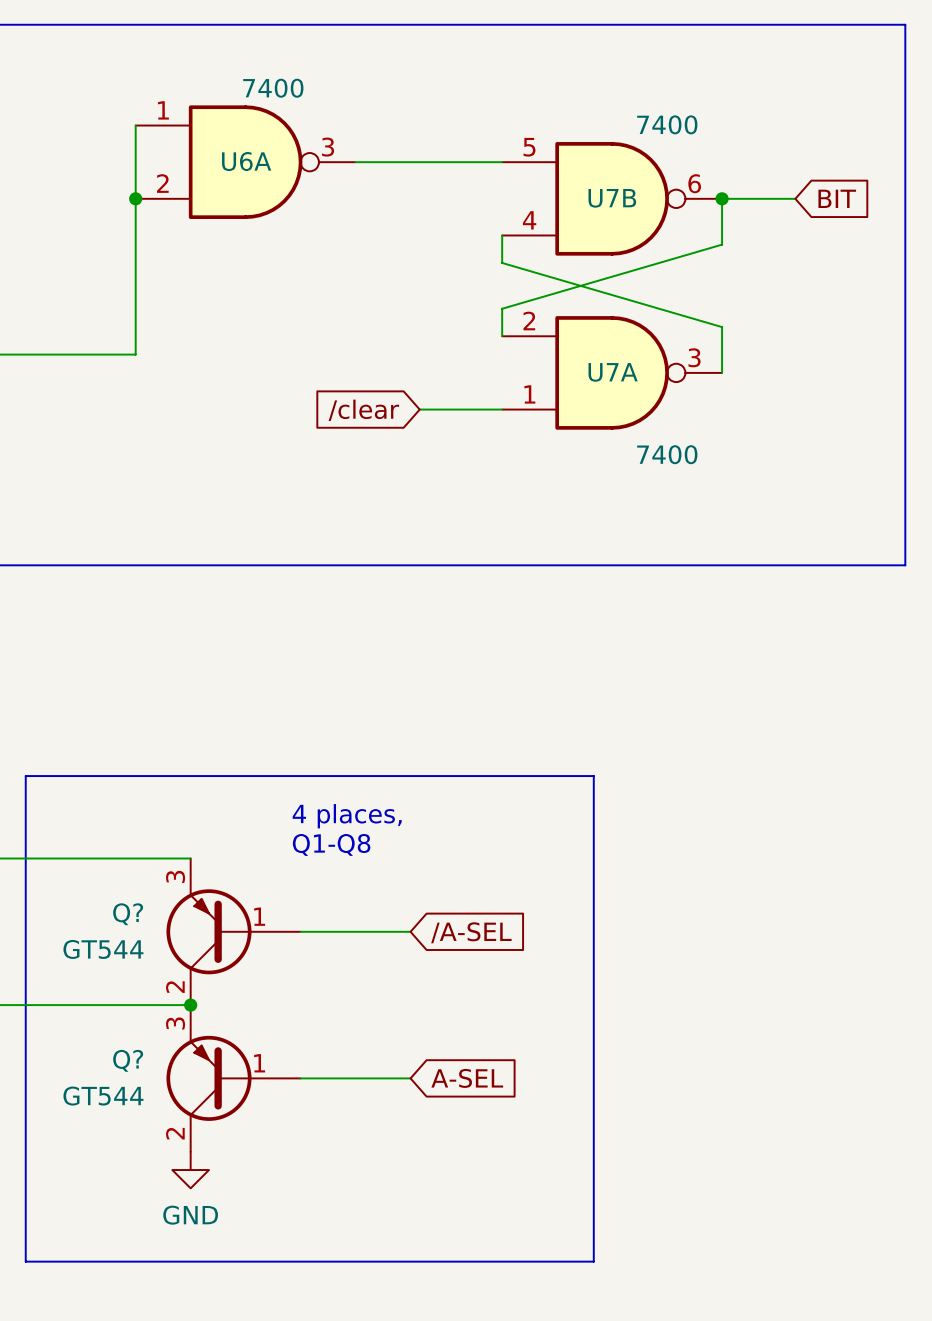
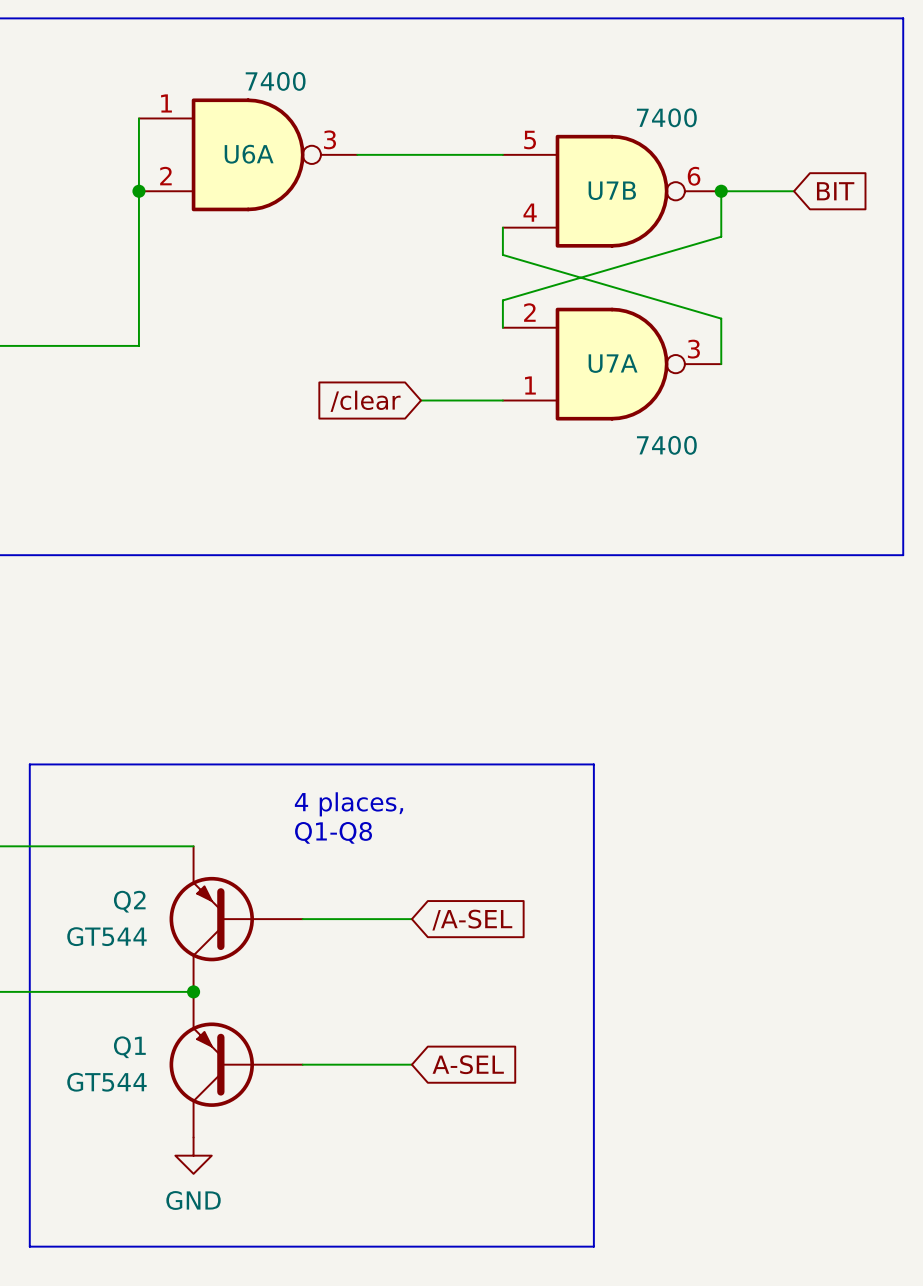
Q? pin number: 3 (175, 876) -> none
Q? name: Q? (128, 914) -> Q2 (129, 901)
Q? pin number: 1 (259, 916) -> none
Q? pin number: 2 (175, 987) -> none
Q? pin number: 3 (175, 1023) -> none
Q? name: Q? (128, 1060) -> Q1 (129, 1047)
Q? pin number: 1 (259, 1063) -> none
Q? pin number: 2 (175, 1133) -> none

